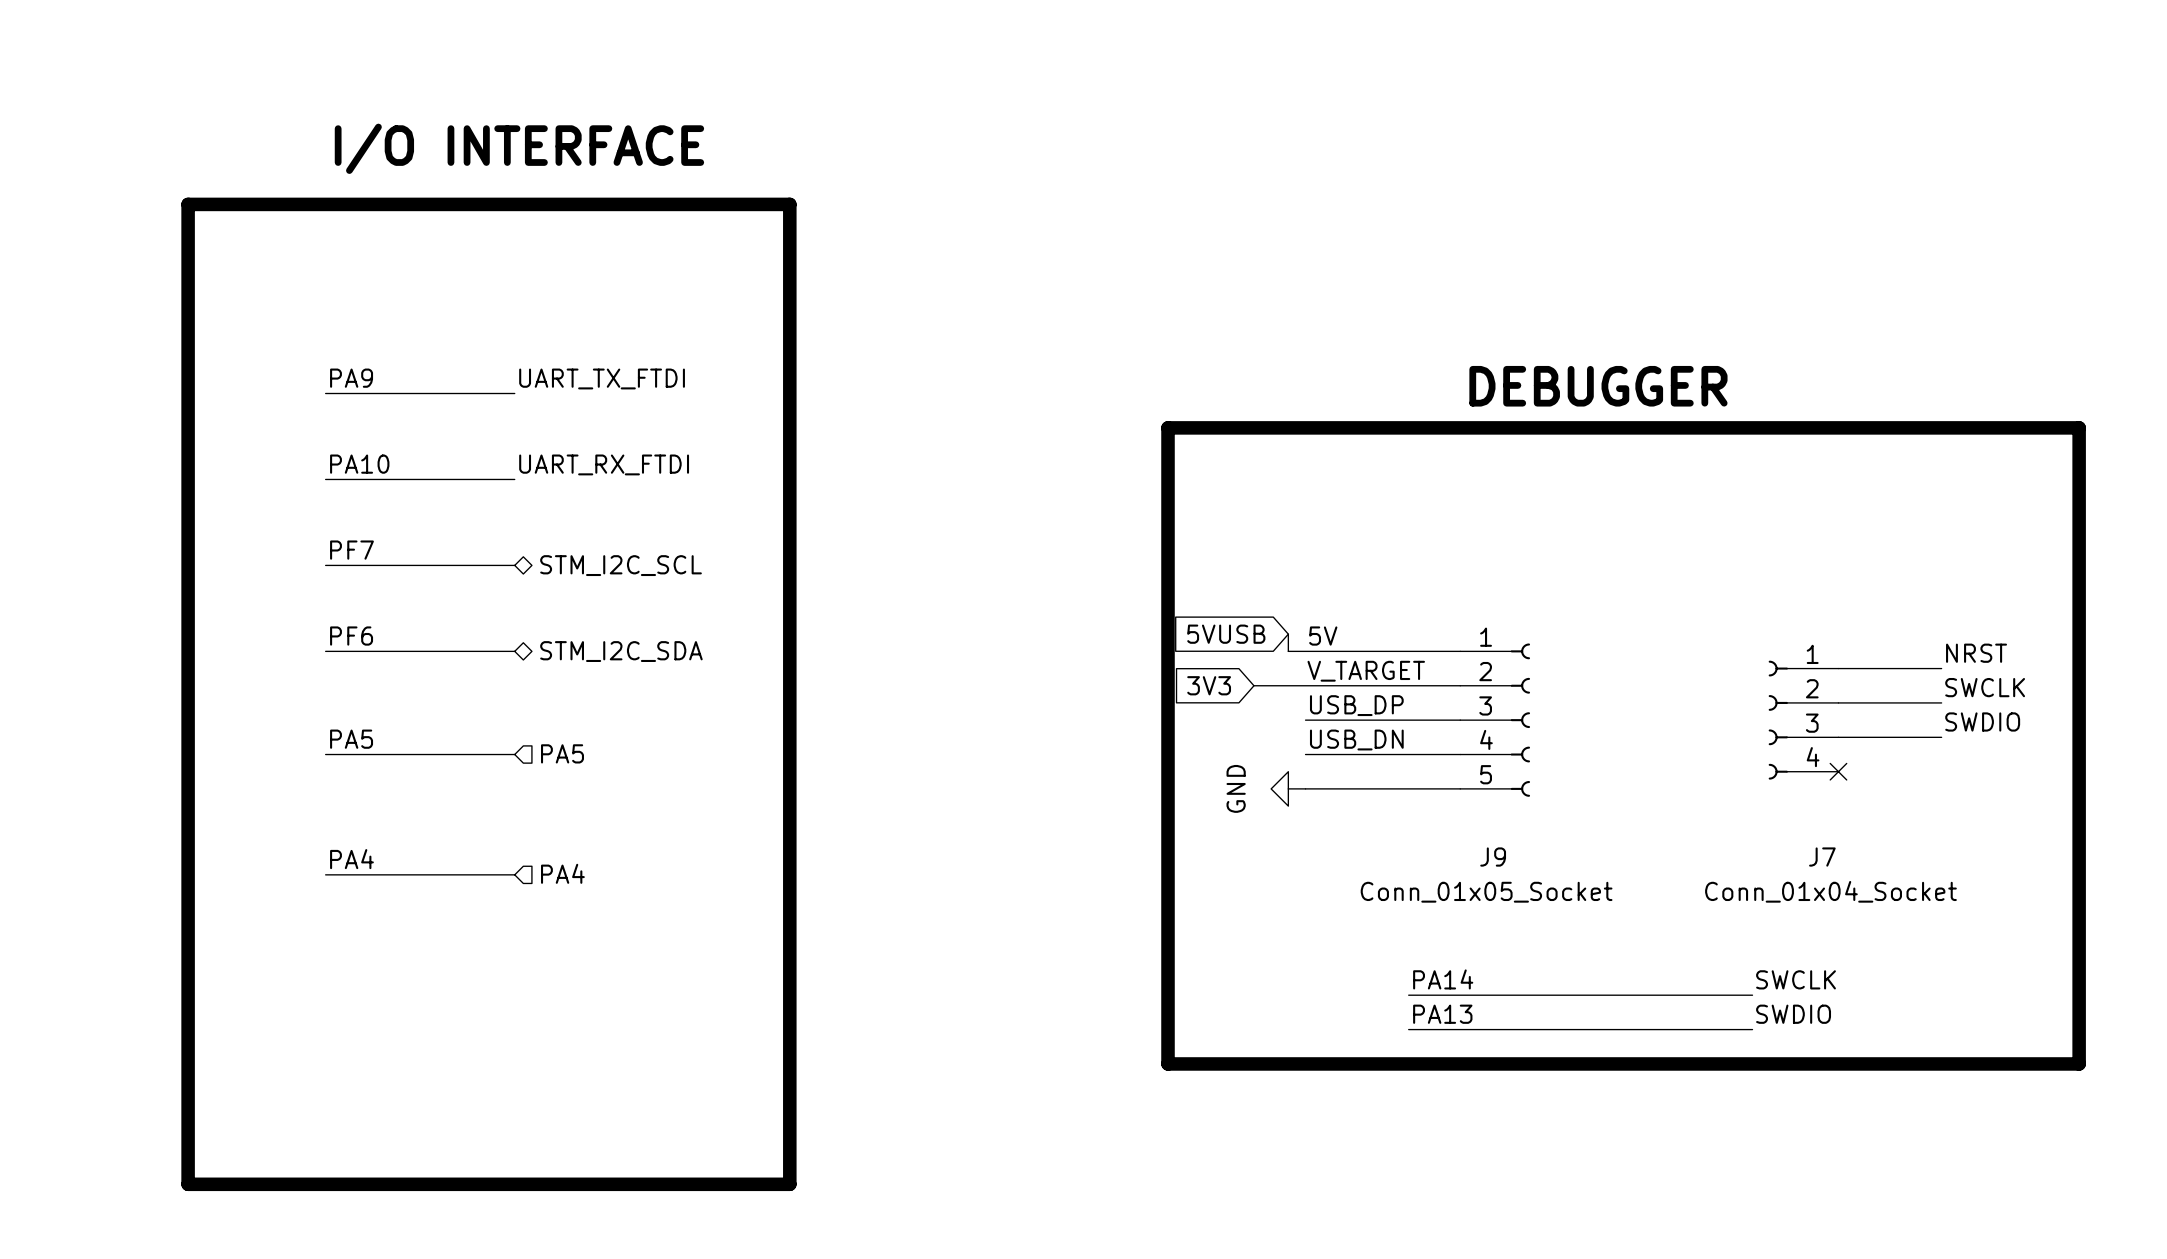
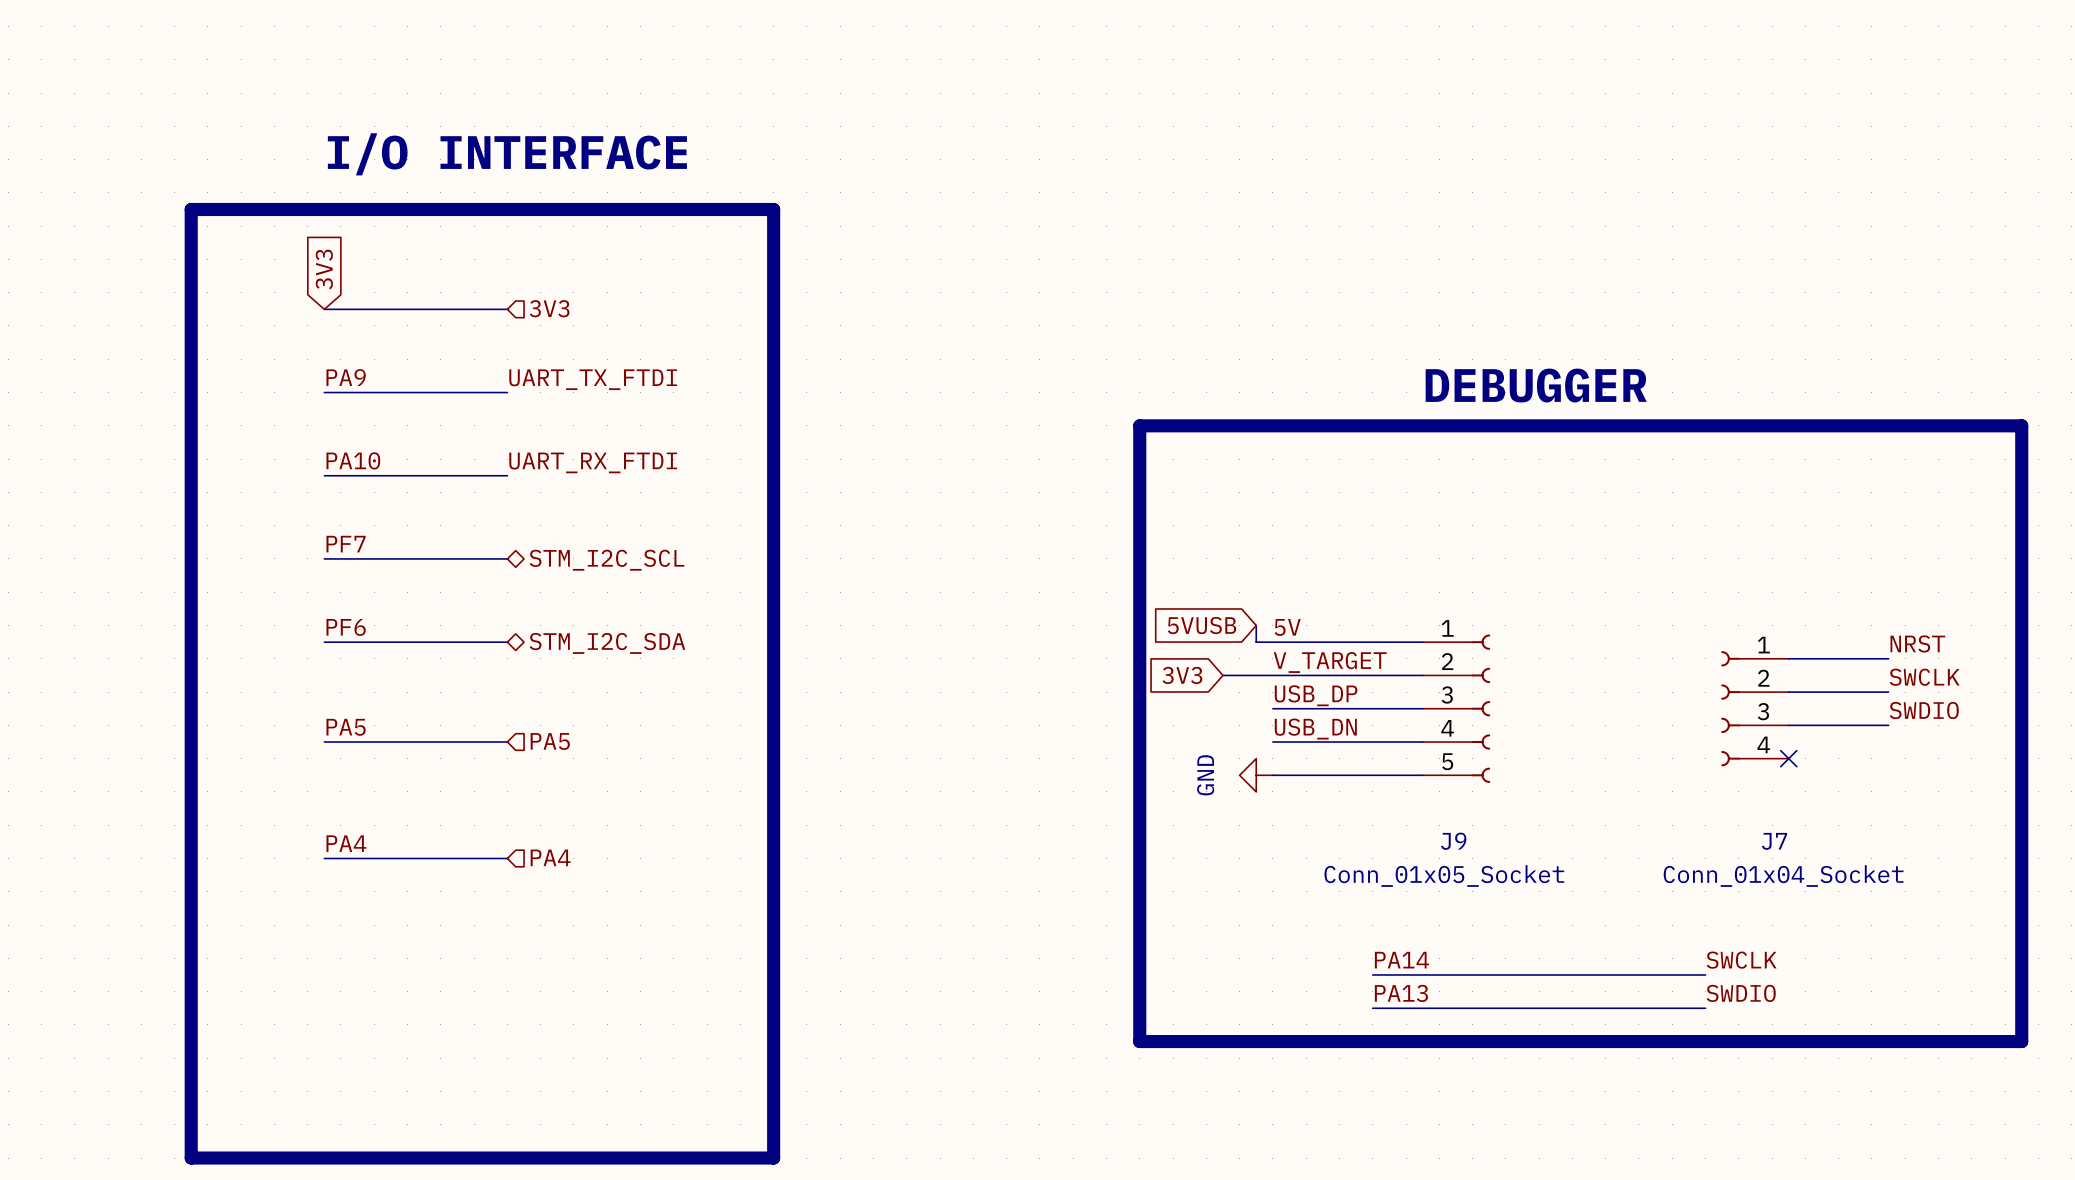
global label: none -> 3V3 (324, 269)
hierarchical label: none -> 3V3 (549, 308)
wire: none -> (324, 309) (507, 309)

